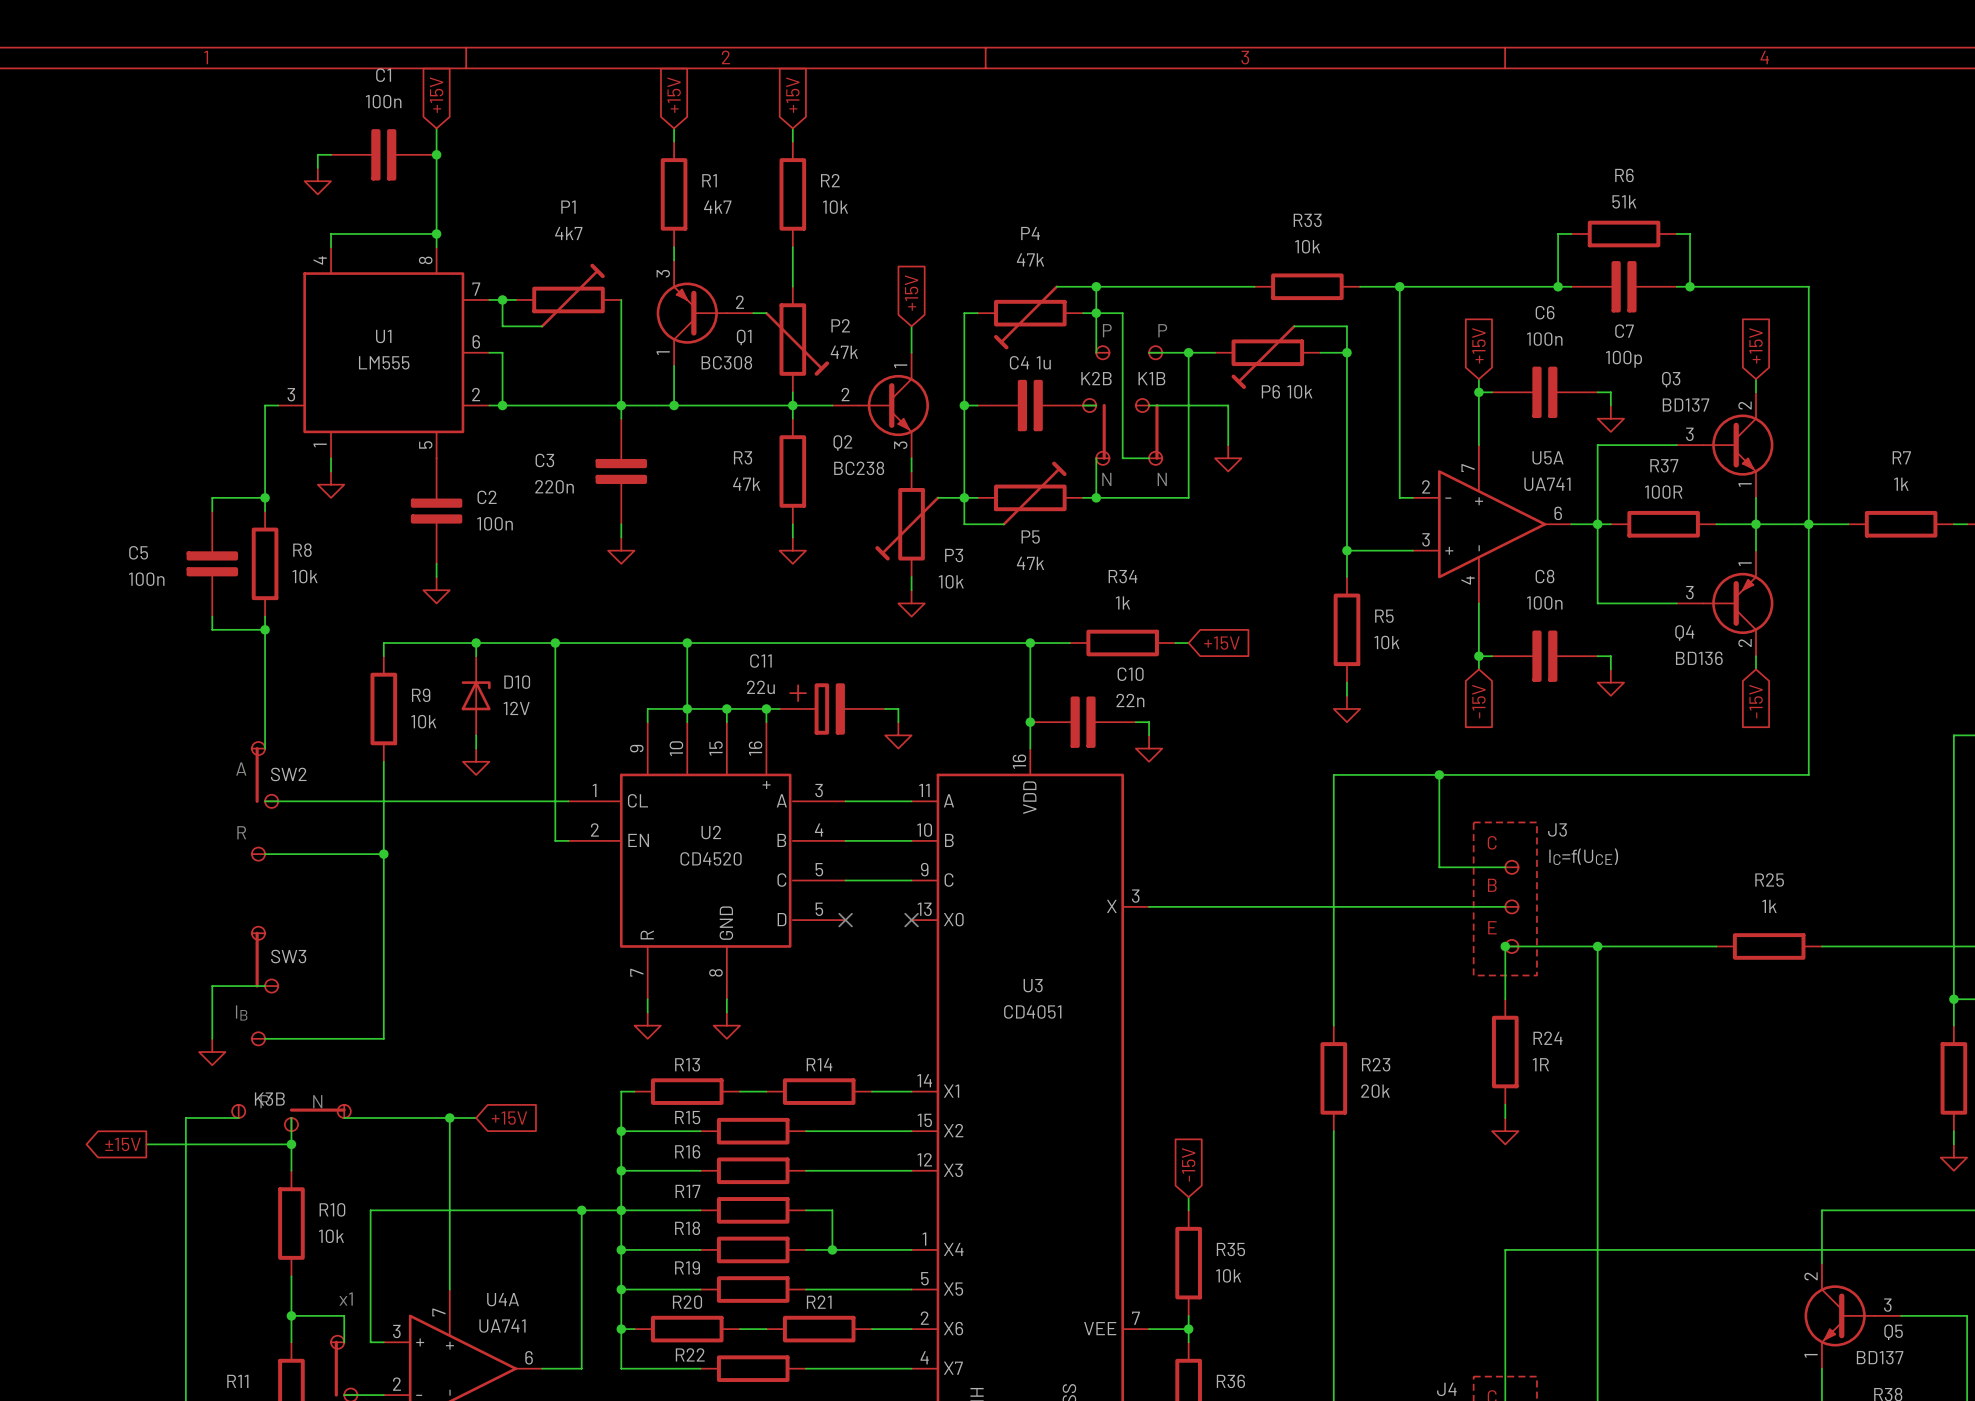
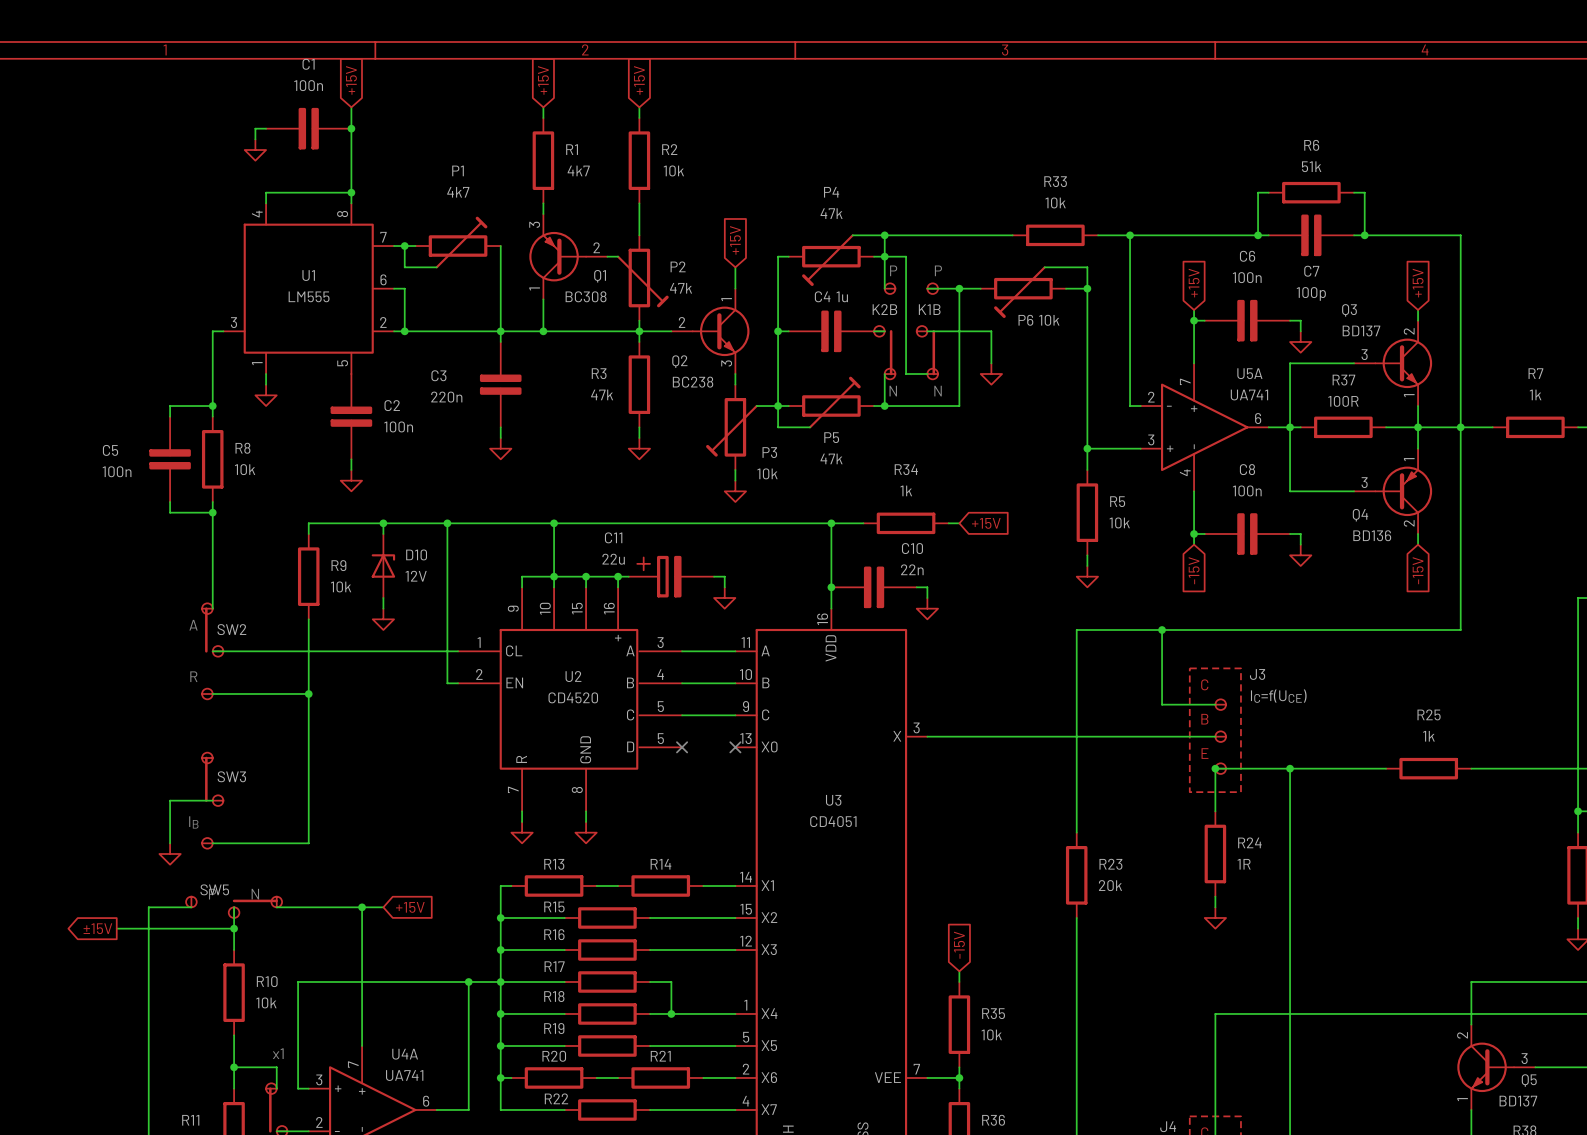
K3B name: K3B (269, 1099) -> SW5 (214, 889)

